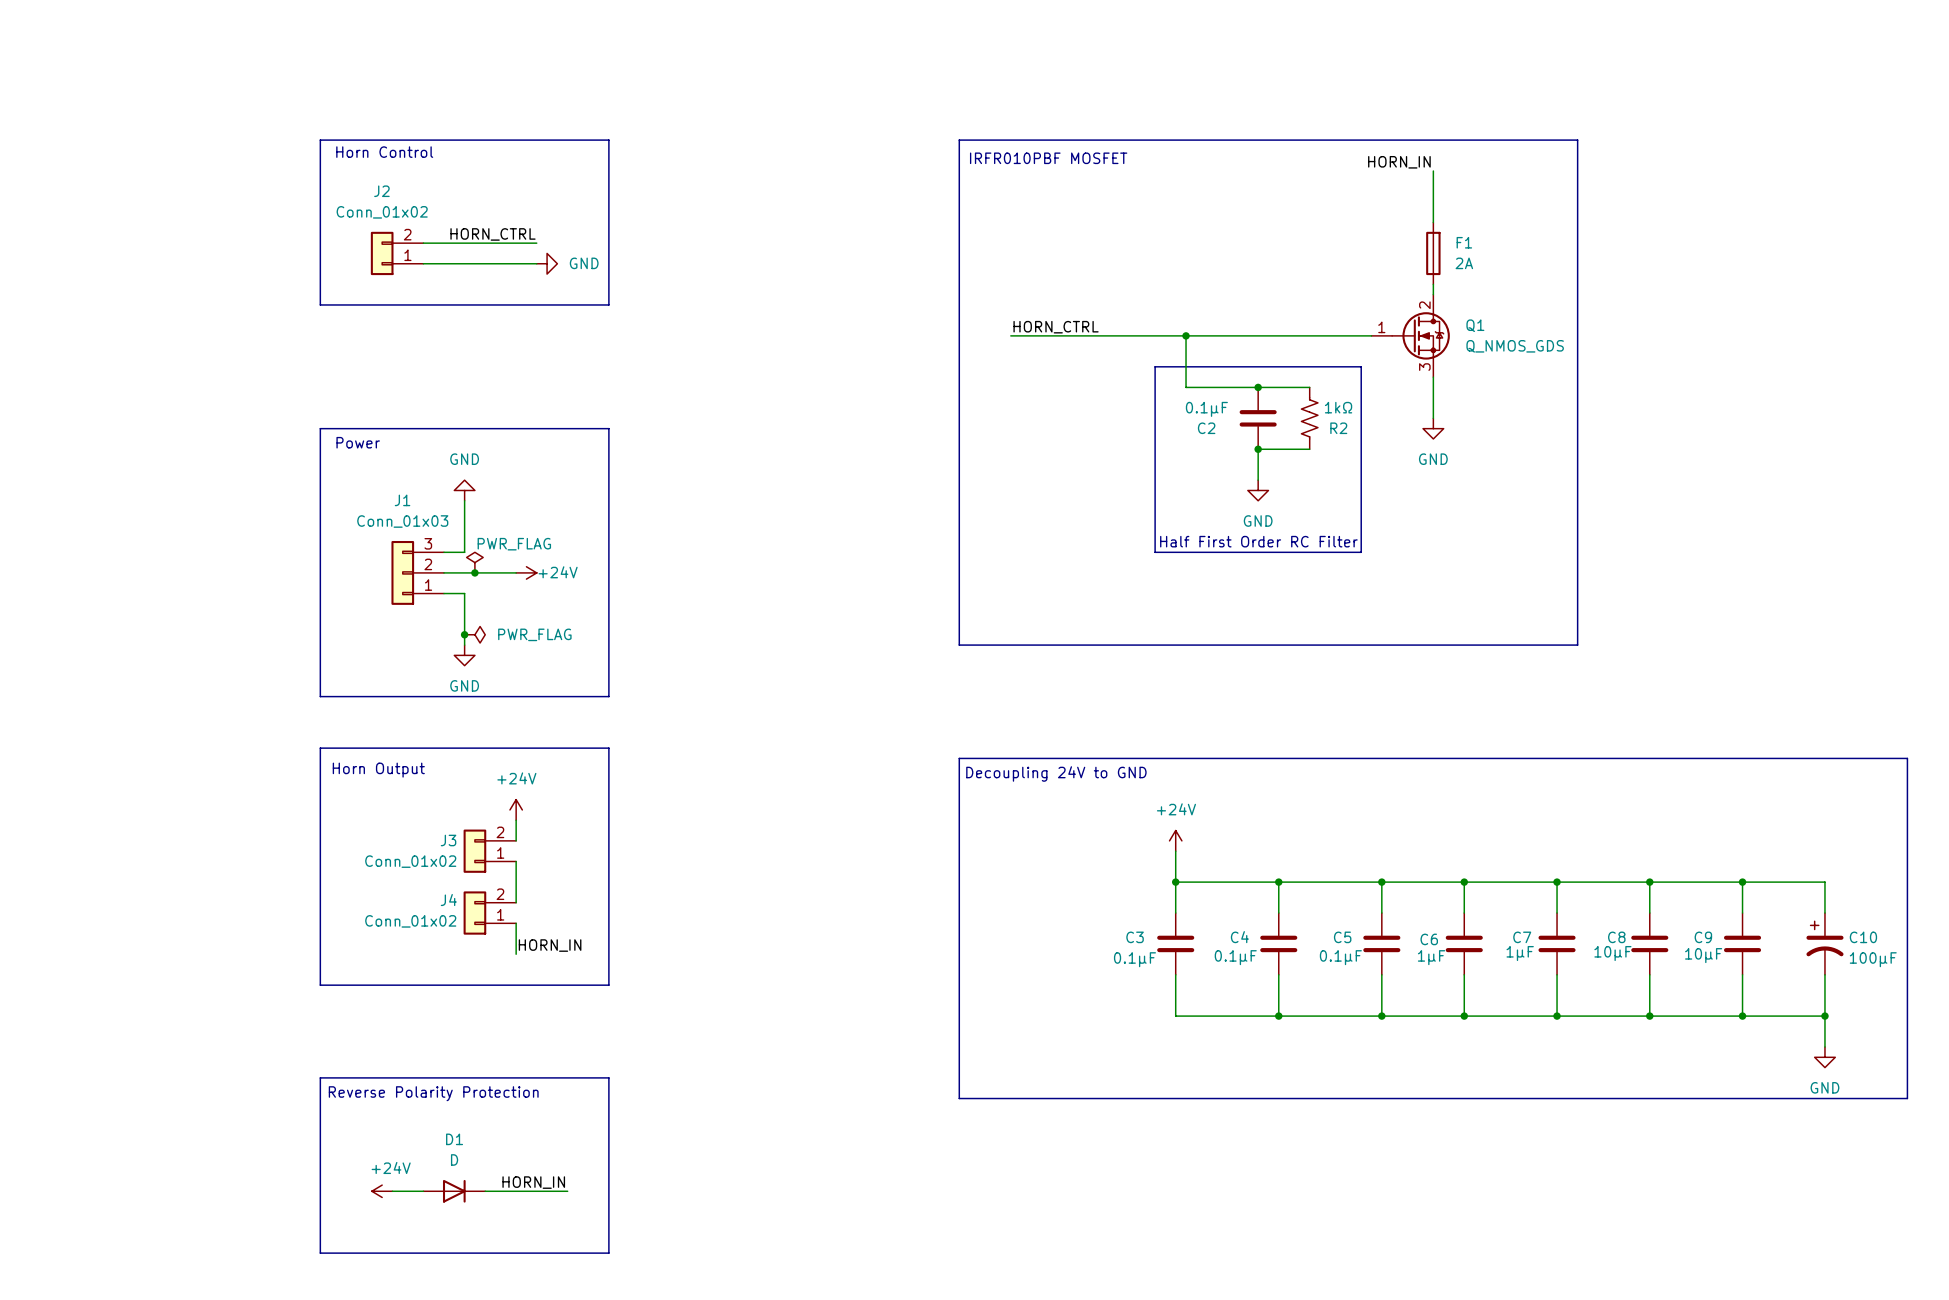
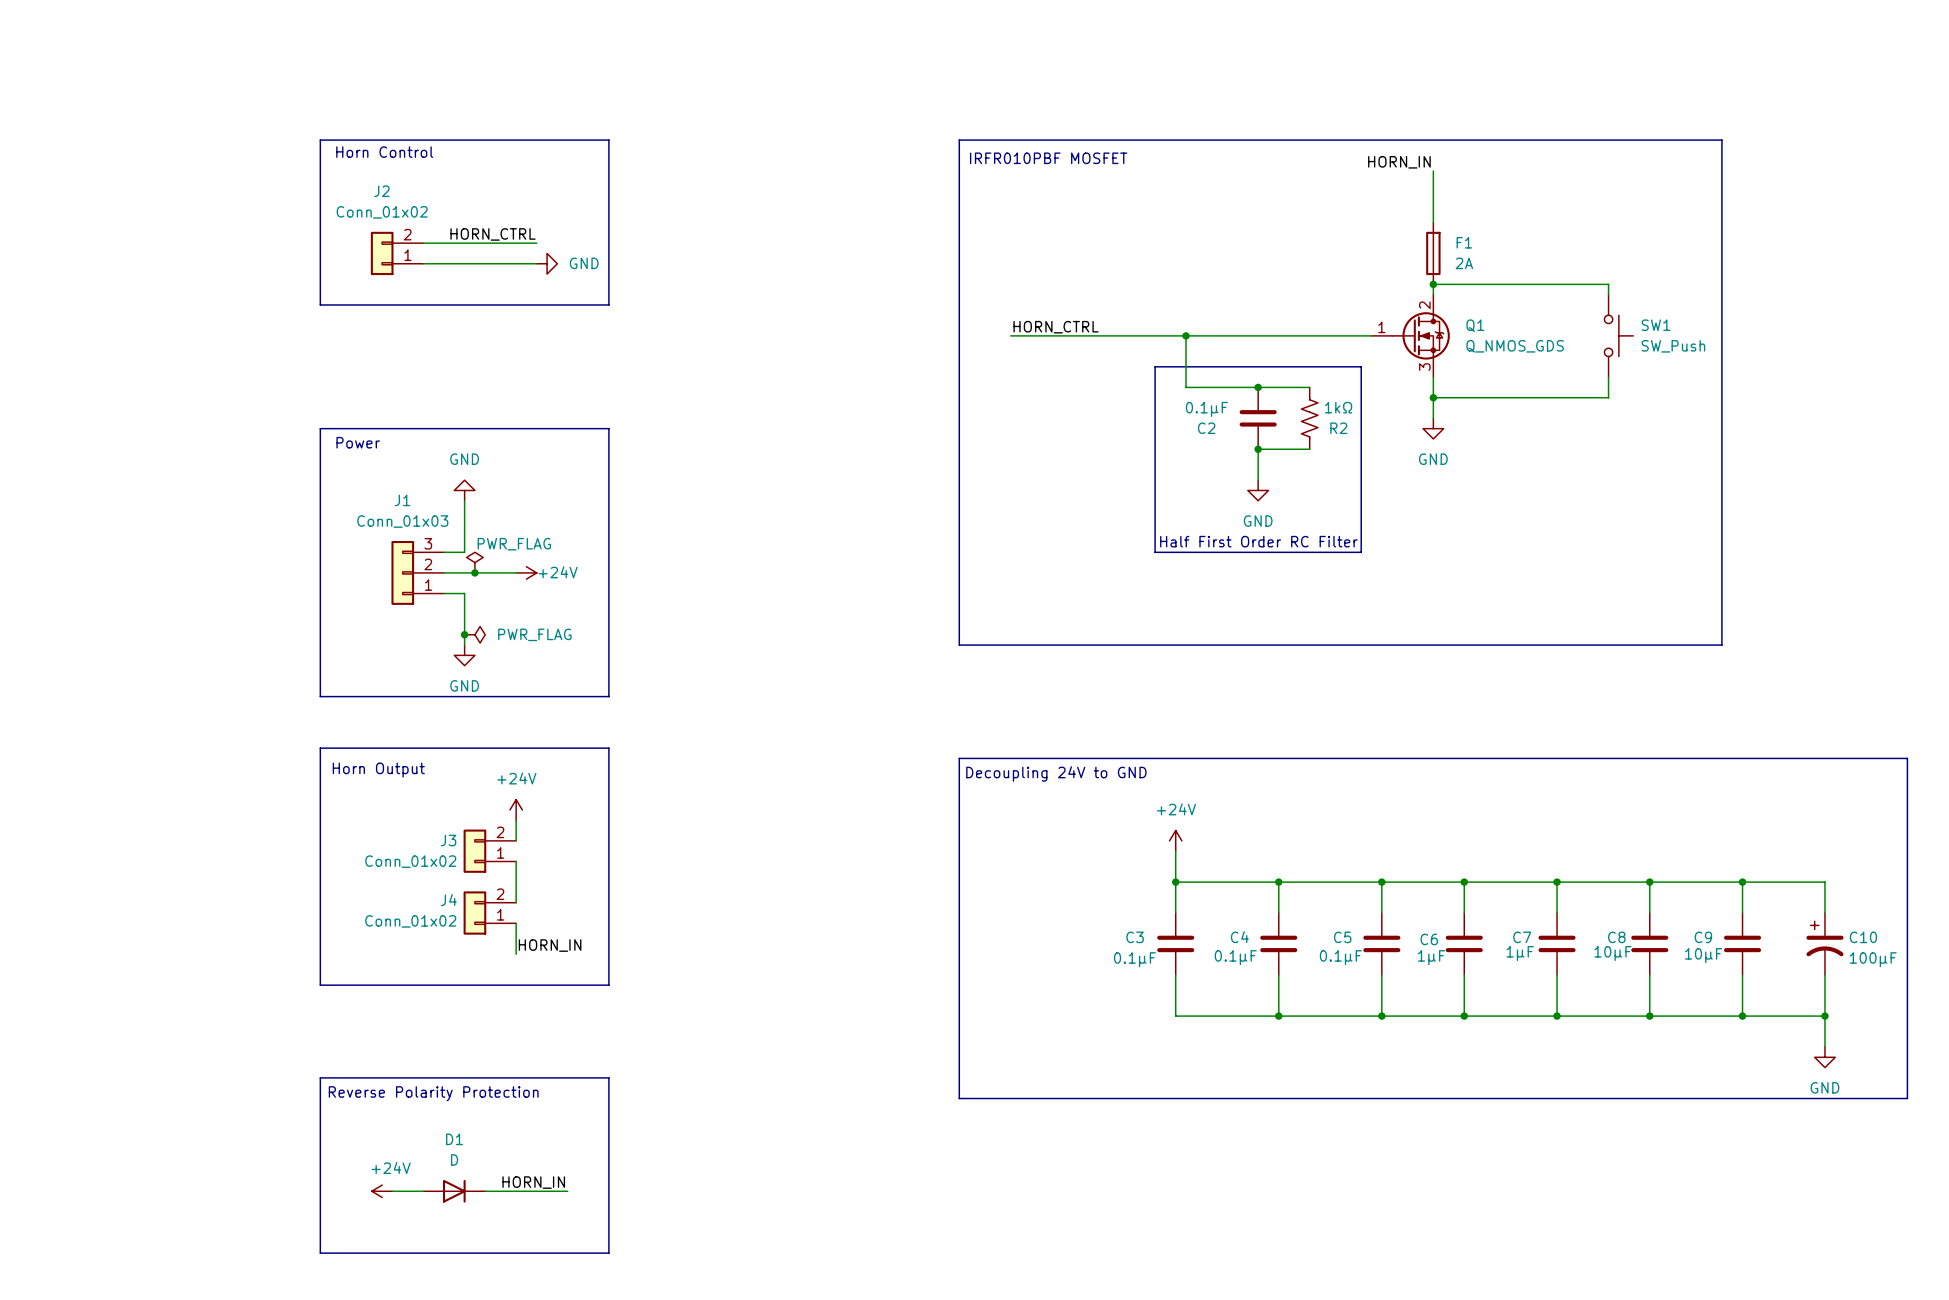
line: (1577, 140) (1577, 645) -> (1577, 140) (1721, 140) (1721, 645) (1577, 645)
wire: none -> (1433, 284) (1608, 284) (1608, 294)
junction: none -> (1433, 284)
SW1: none -> SW_Push (1618, 335)
wire: none -> (1608, 377) (1608, 397) (1433, 397)
junction: none -> (1433, 397)

